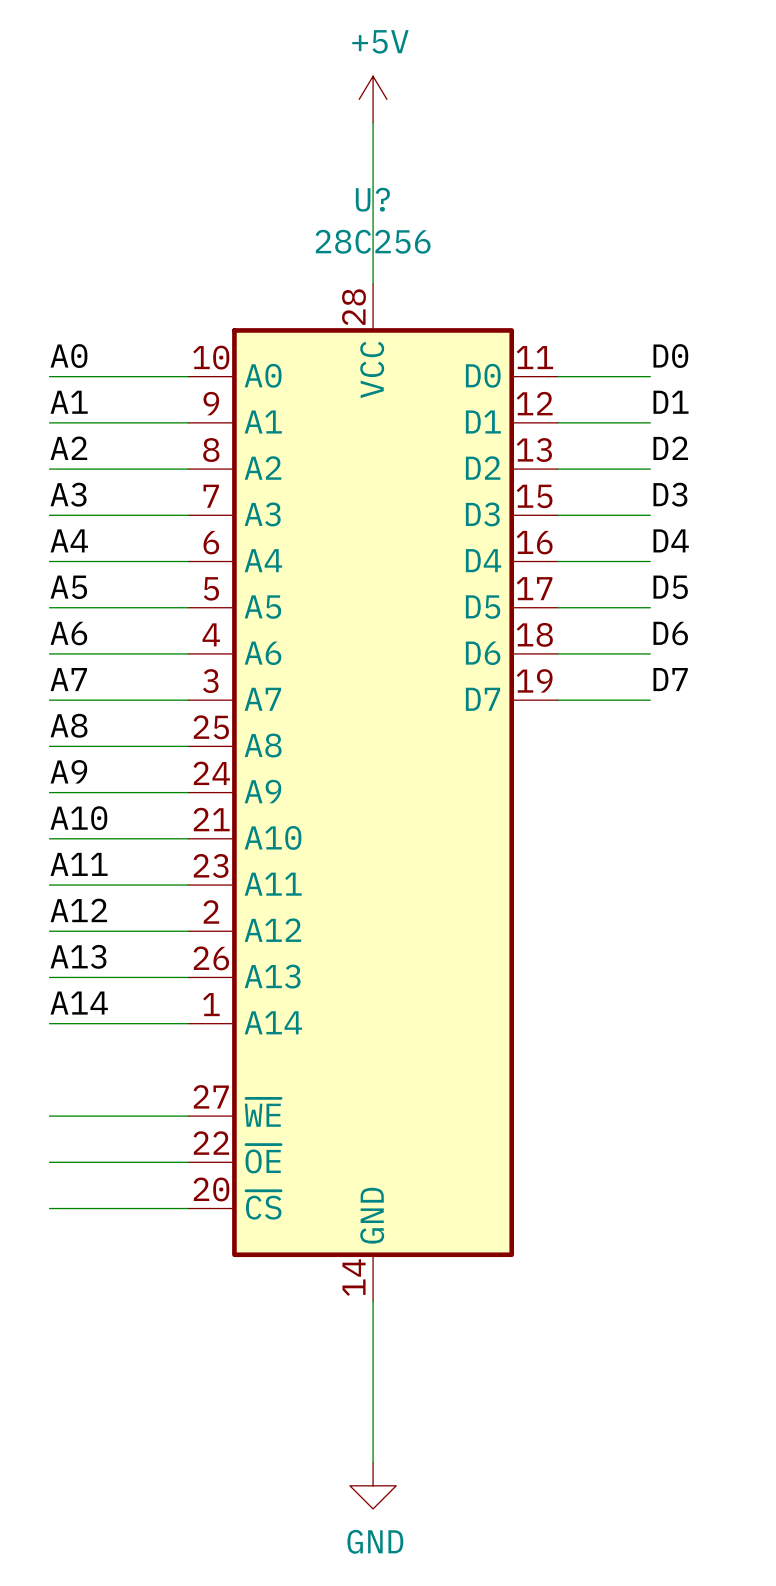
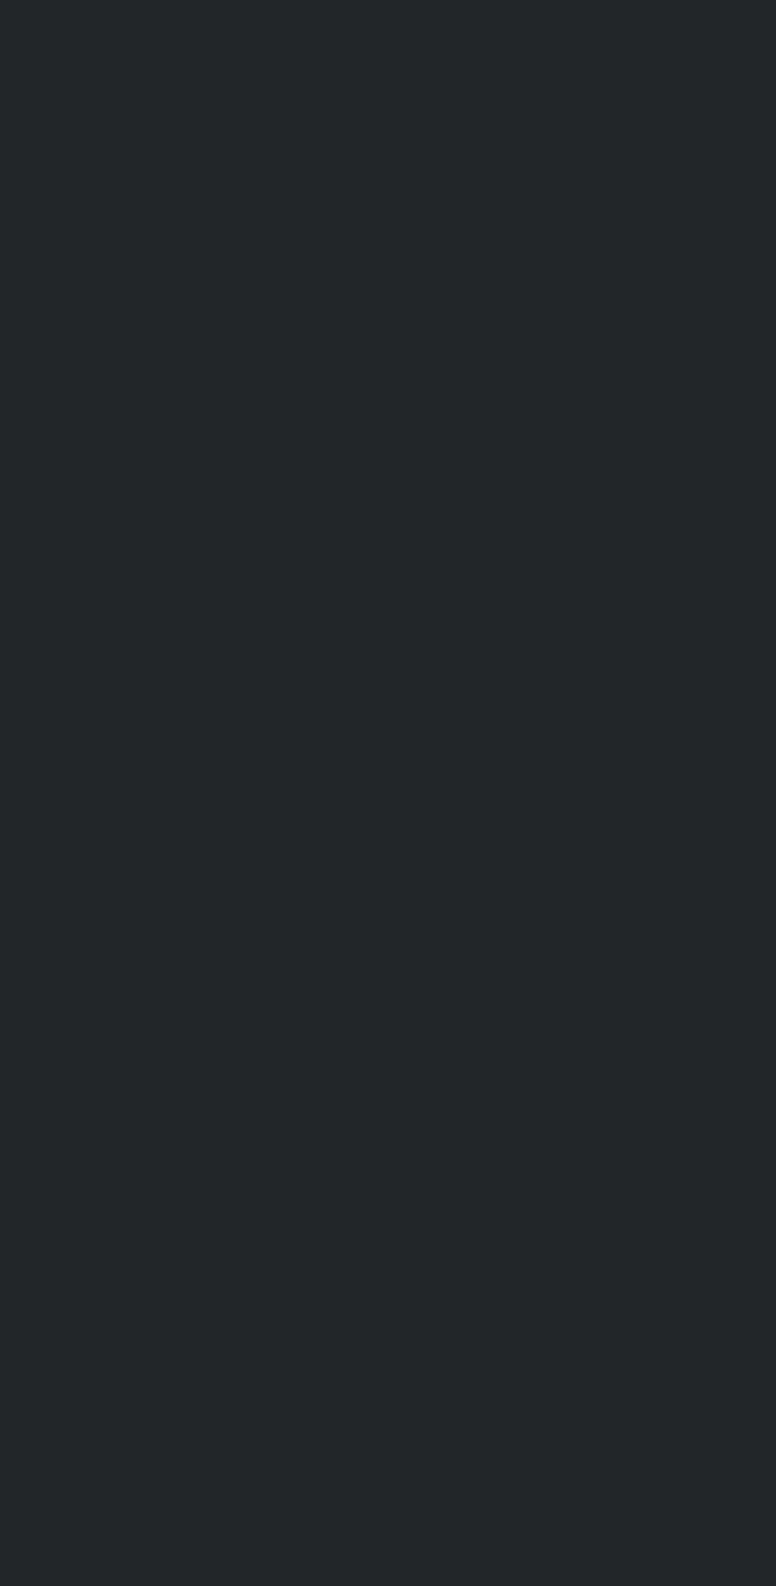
power symbol: +5V (373, 99) -> none
wire: (373, 122) (373, 284) -> none
label: A0 (69, 356) -> none
label: D0 (670, 356) -> none
wire: (49, 376) (188, 376) -> none
wire: (557, 376) (650, 376) -> none
label: A1 (69, 402) -> none
label: D1 (671, 402) -> none
wire: (49, 422) (188, 422) -> none
wire: (557, 422) (650, 422) -> none
label: A2 (68, 448) -> none
label: D2 (670, 448) -> none
wire: (49, 469) (188, 469) -> none
wire: (557, 469) (650, 469) -> none
label: A3 (68, 494) -> none
label: D3 (670, 494) -> none
wire: (49, 515) (188, 515) -> none
wire: (557, 515) (650, 515) -> none
label: A4 (69, 540) -> none
label: D4 (671, 540) -> none
wire: (49, 561) (188, 561) -> none
wire: (557, 561) (650, 561) -> none
label: A5 (68, 587) -> none
label: D5 (670, 587) -> none
wire: (49, 607) (188, 607) -> none
wire: (557, 607) (650, 607) -> none
label: A6 (68, 633) -> none
label: D6 (670, 633) -> none
wire: (49, 653) (188, 653) -> none
wire: (557, 653) (650, 653) -> none
label: A7 (68, 679) -> none
label: D7 (670, 679) -> none
wire: (49, 700) (188, 700) -> none
wire: (557, 700) (650, 700) -> none
label: A8 (69, 725) -> none
wire: (49, 746) (188, 746) -> none
label: A9 (68, 771) -> none
wire: (49, 792) (188, 792) -> none
U?: 28C256 (373, 792) -> none
label: A10 (78, 818) -> none
wire: (49, 838) (188, 838) -> none
label: A11 (79, 864) -> none
wire: (49, 885) (188, 885) -> none
label: A12 (78, 910) -> none
wire: (49, 931) (188, 931) -> none
label: A13 (78, 956) -> none
wire: (49, 977) (188, 977) -> none
label: A14 (79, 1003) -> none
wire: (49, 1023) (188, 1023) -> none
wire: (49, 1116) (188, 1116) -> none
wire: (49, 1162) (188, 1162) -> none
wire: (49, 1208) (188, 1208) -> none
wire: (373, 1300) (373, 1462) -> none
power symbol: GND (373, 1485) -> none

